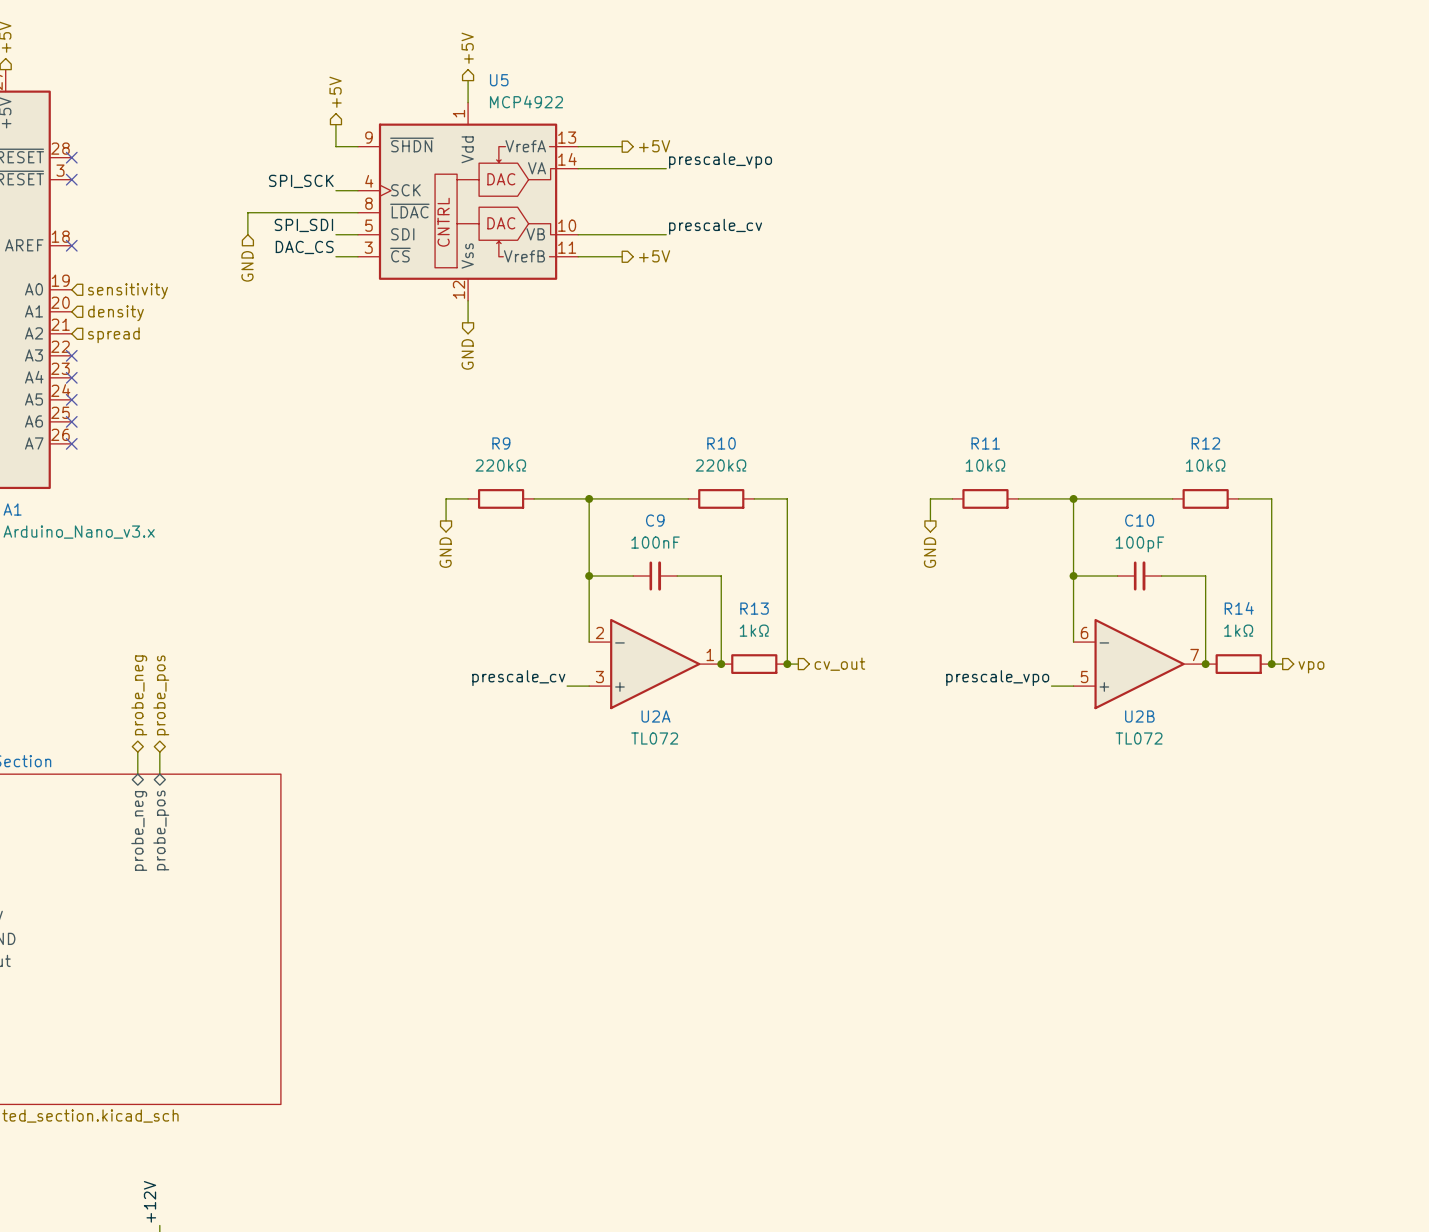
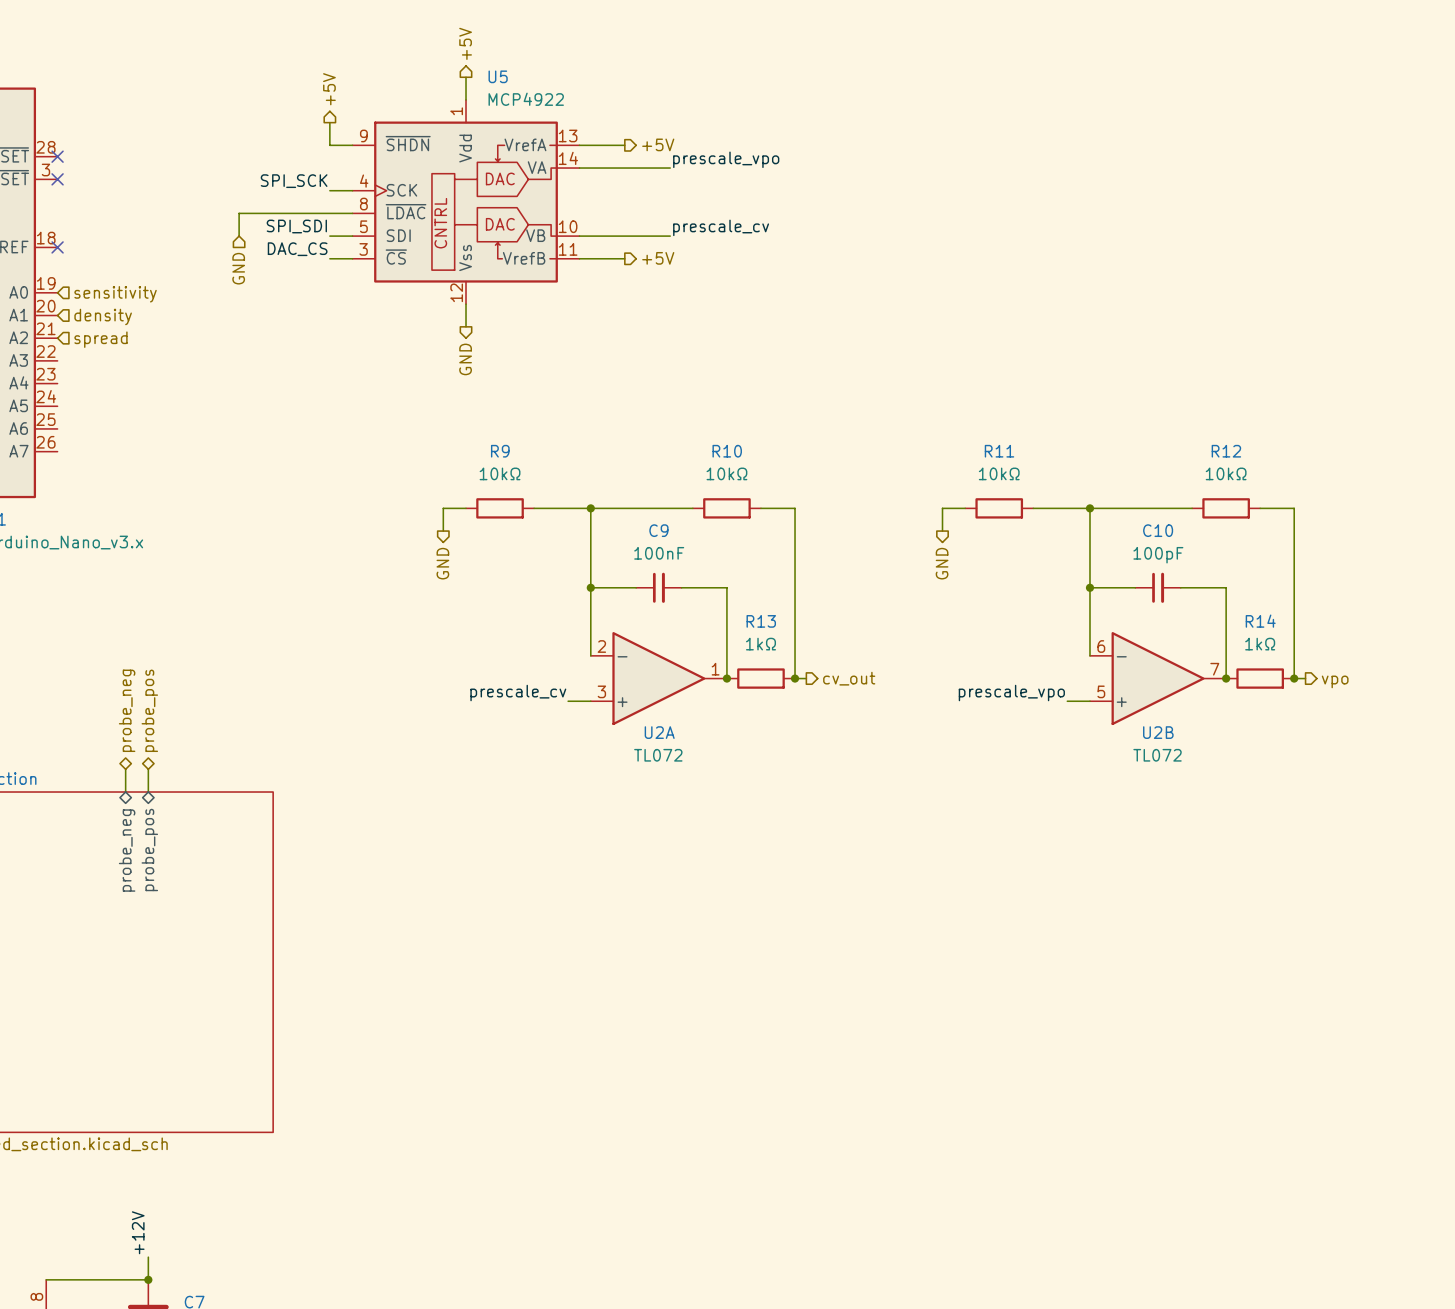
no-connect mark: (71, 355) -> none
no-connect mark: (71, 377) -> none
no-connect mark: (71, 399) -> none
no-connect mark: (71, 421) -> none
no-connect mark: (71, 443) -> none
R9 value: 220kΩ (500, 465) -> 10kΩ (500, 473)
R10 value: 220kΩ (721, 465) -> 10kΩ (726, 473)

